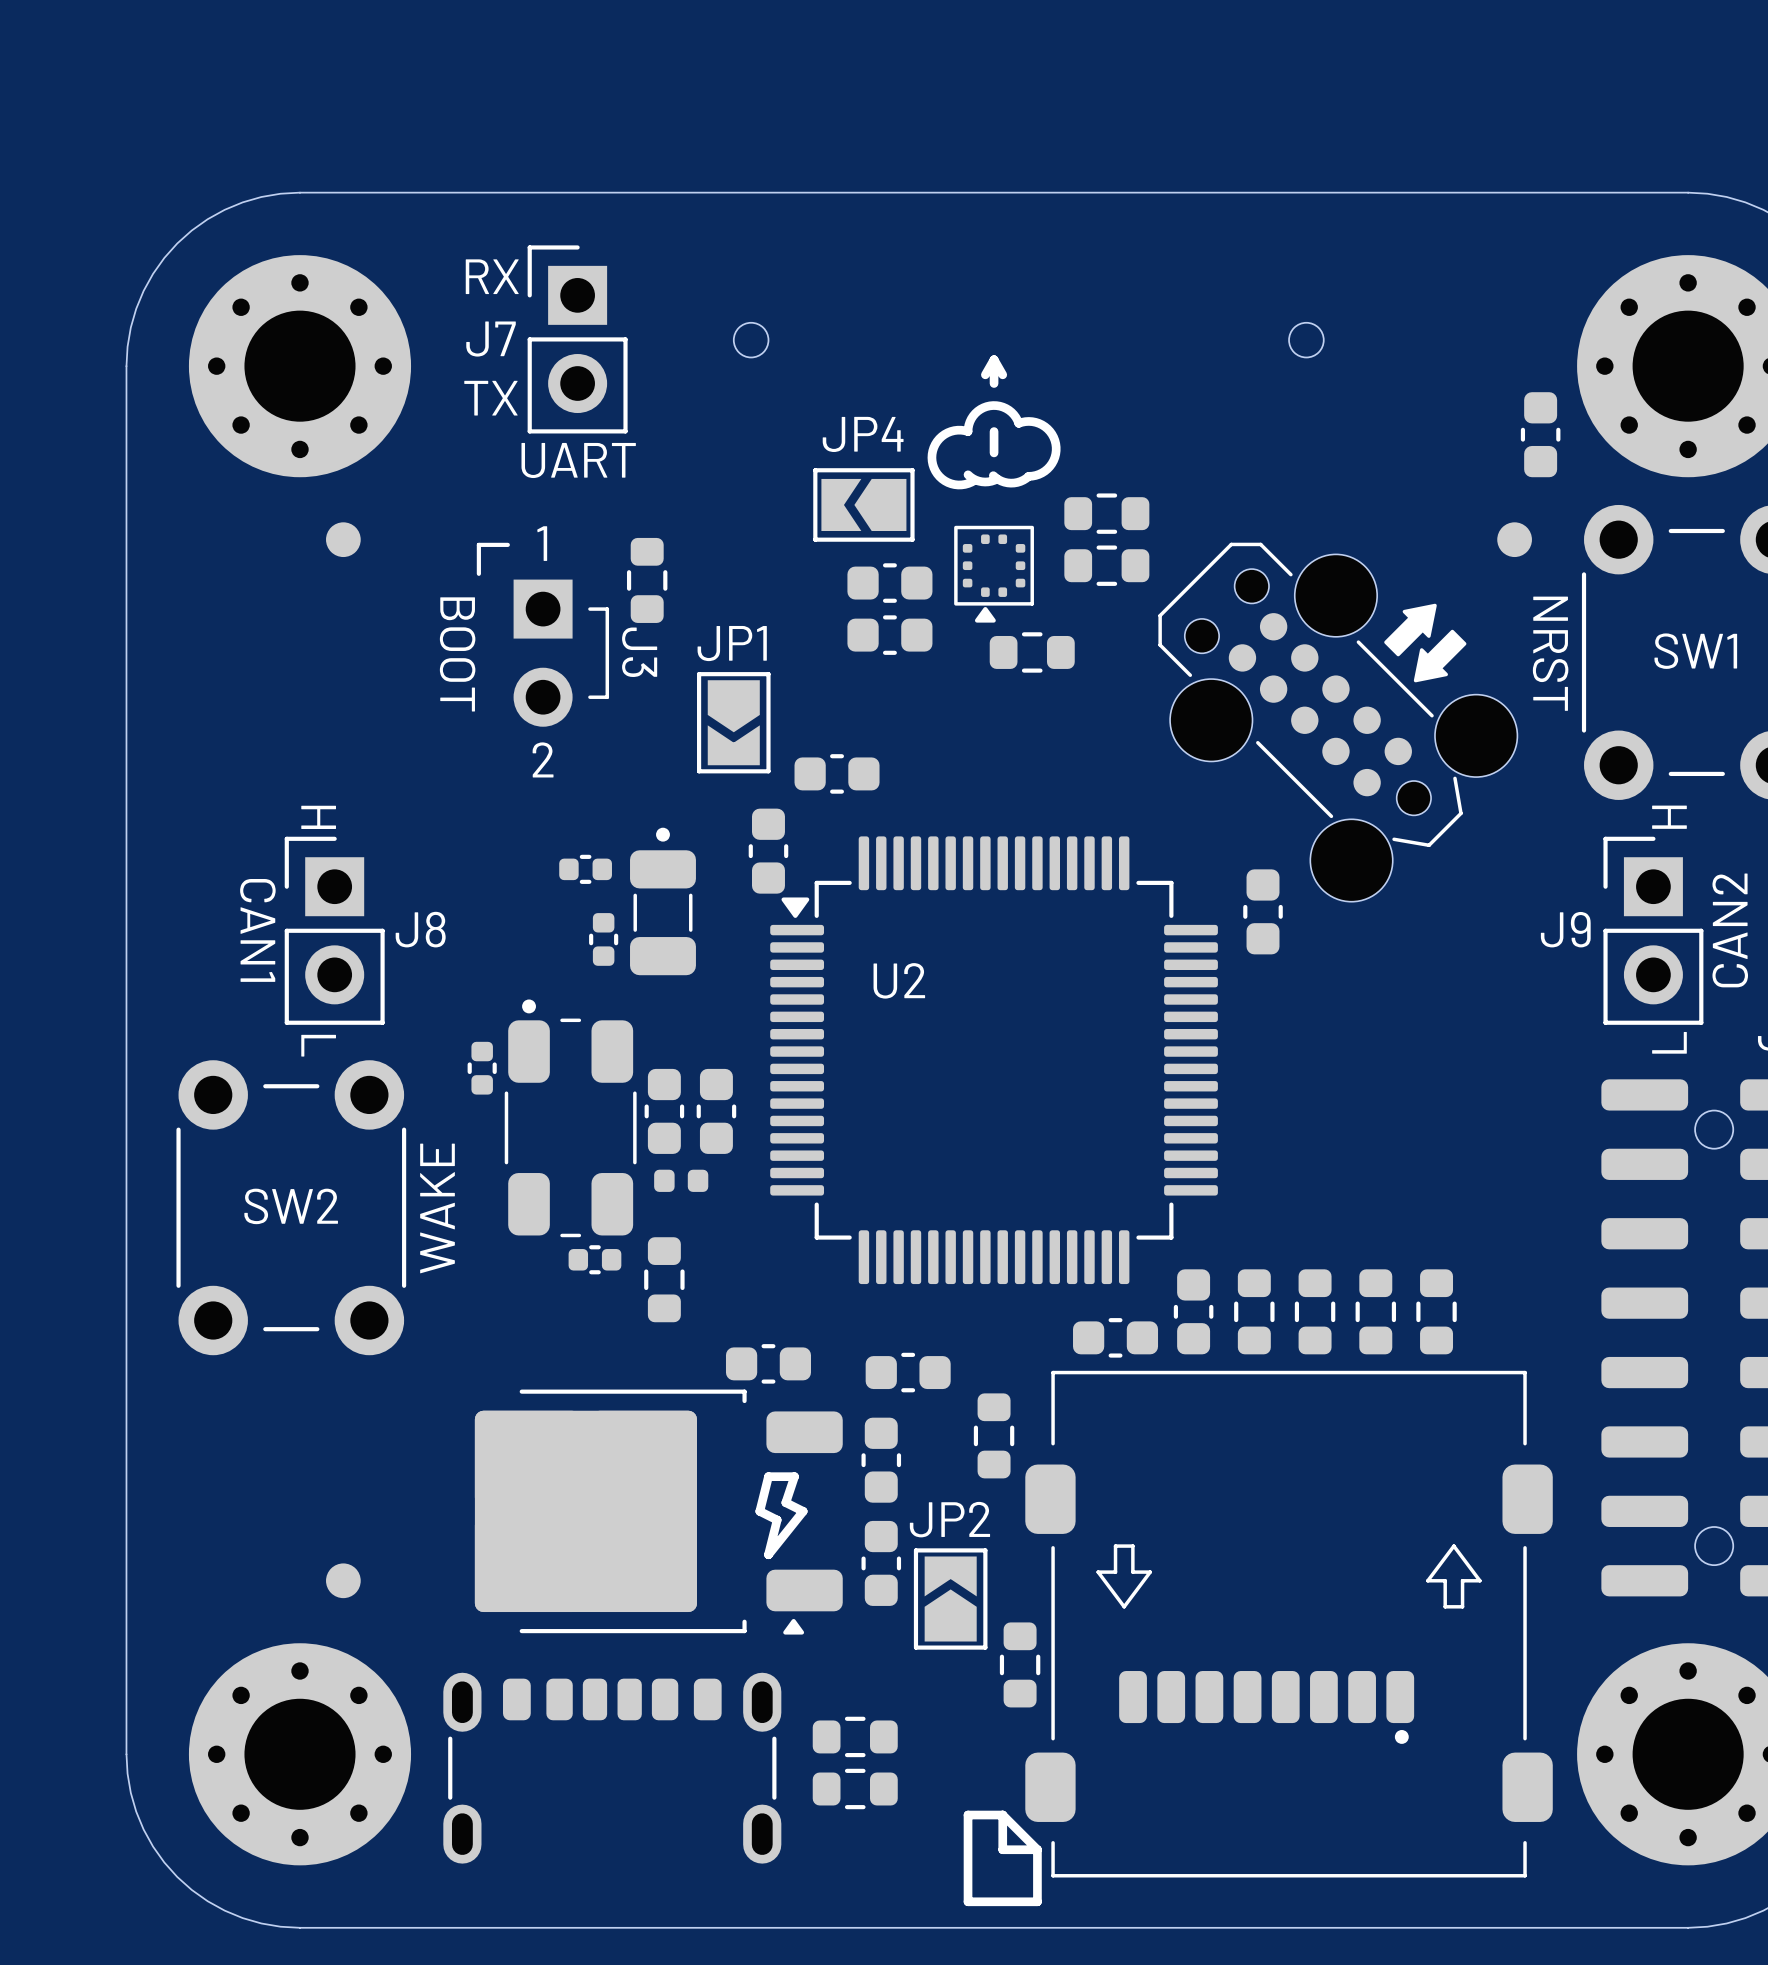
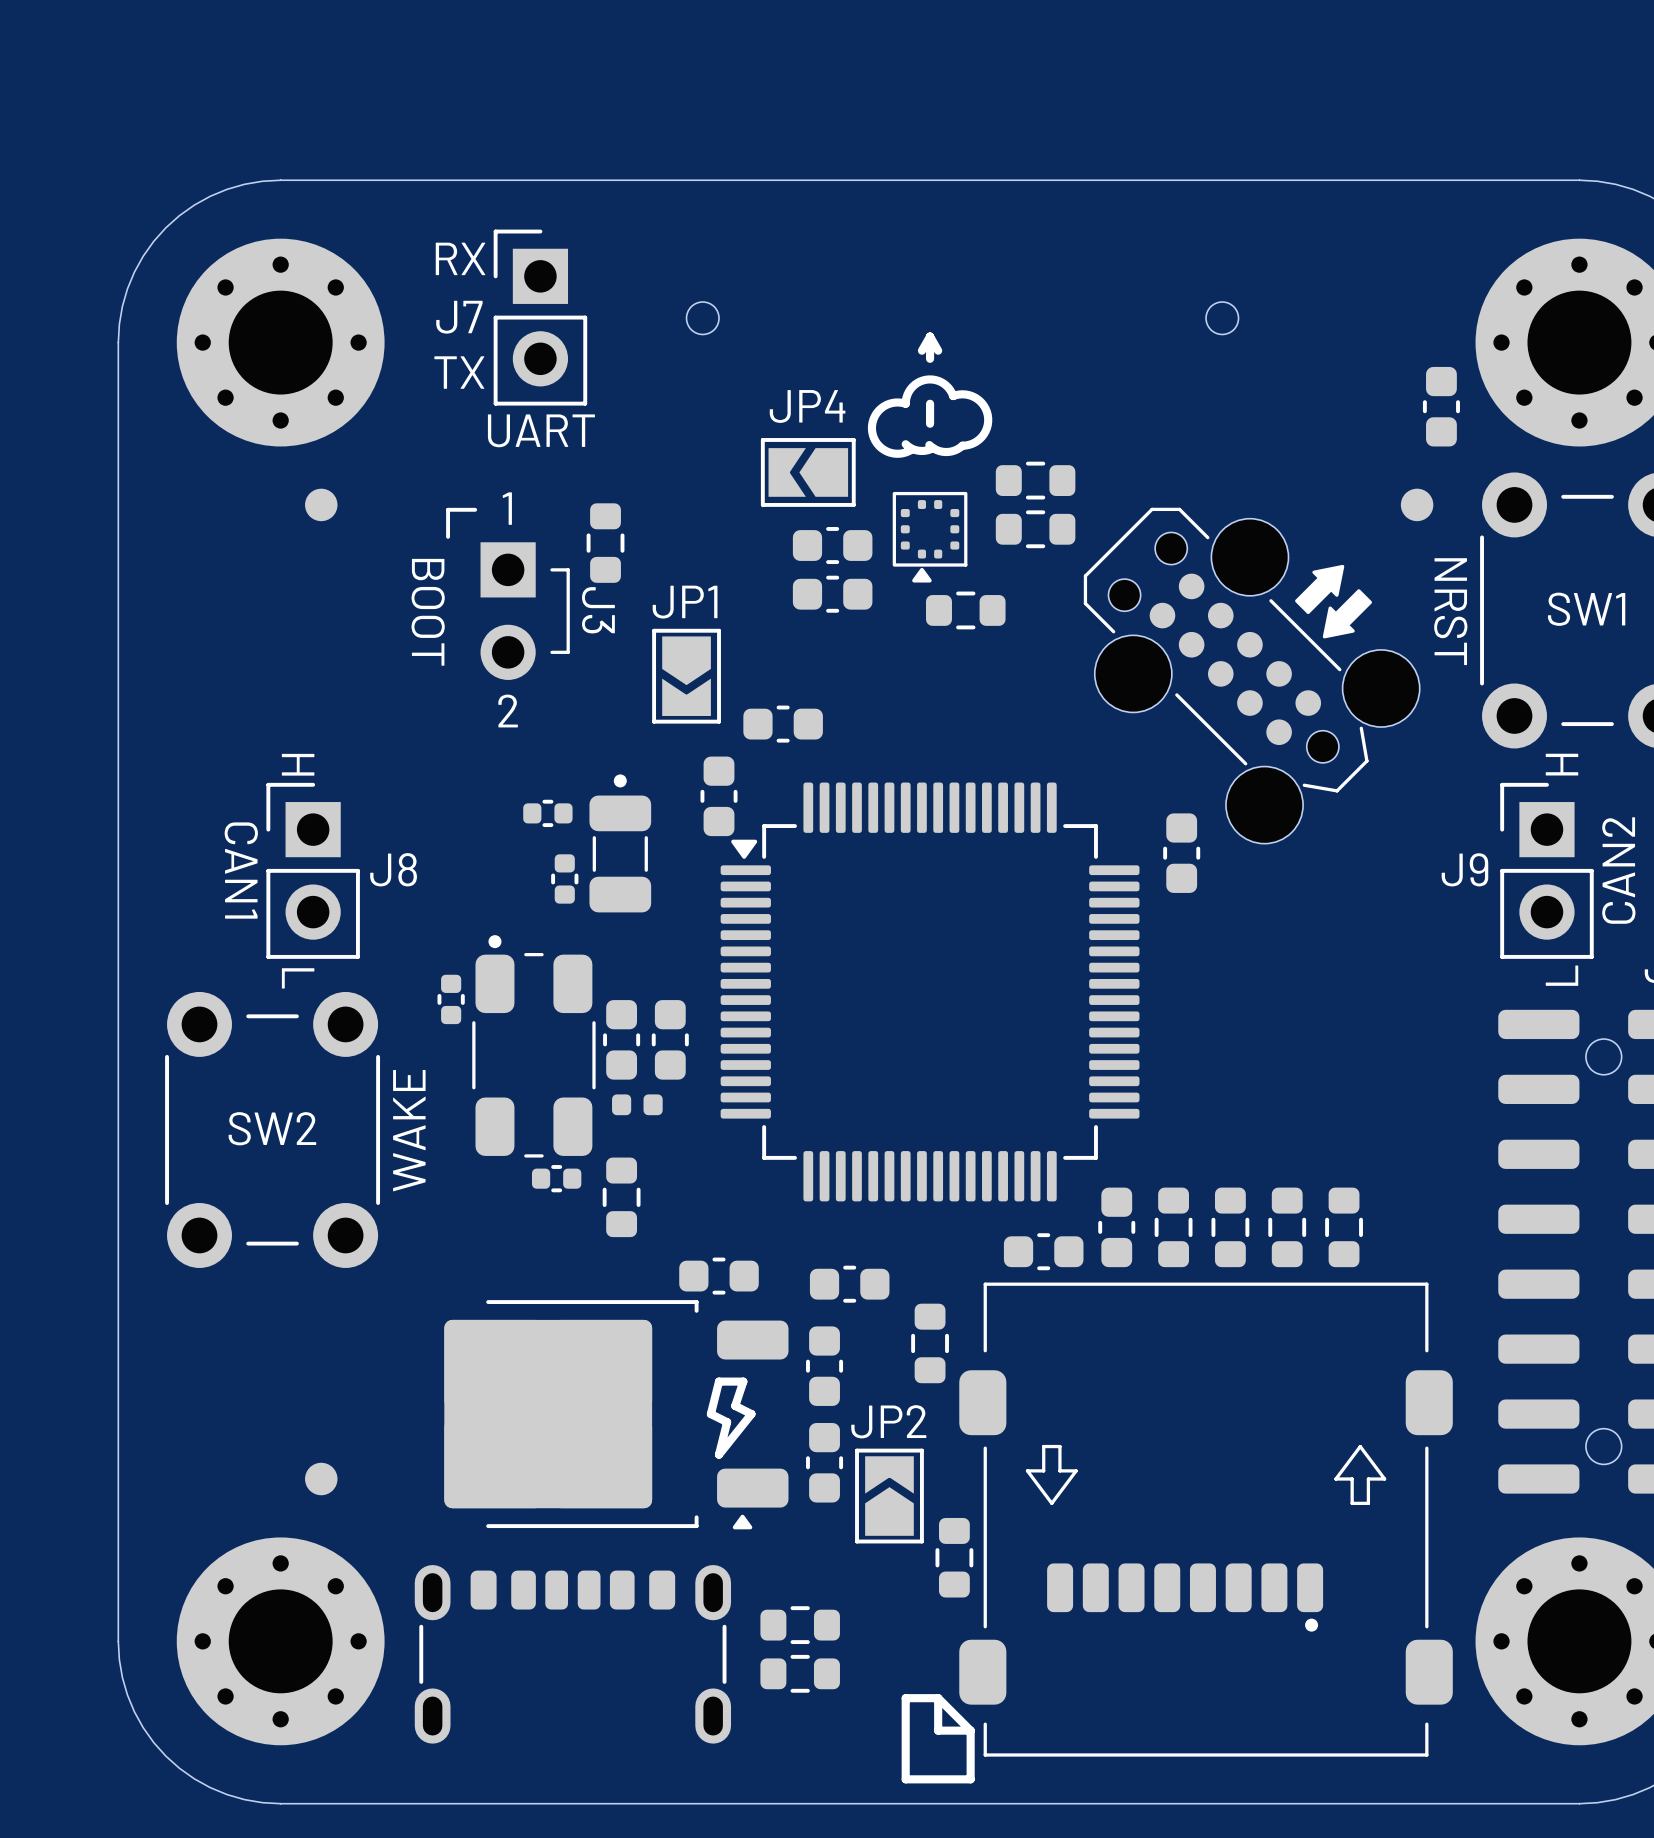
U2 name: U2 (899, 980) -> none

